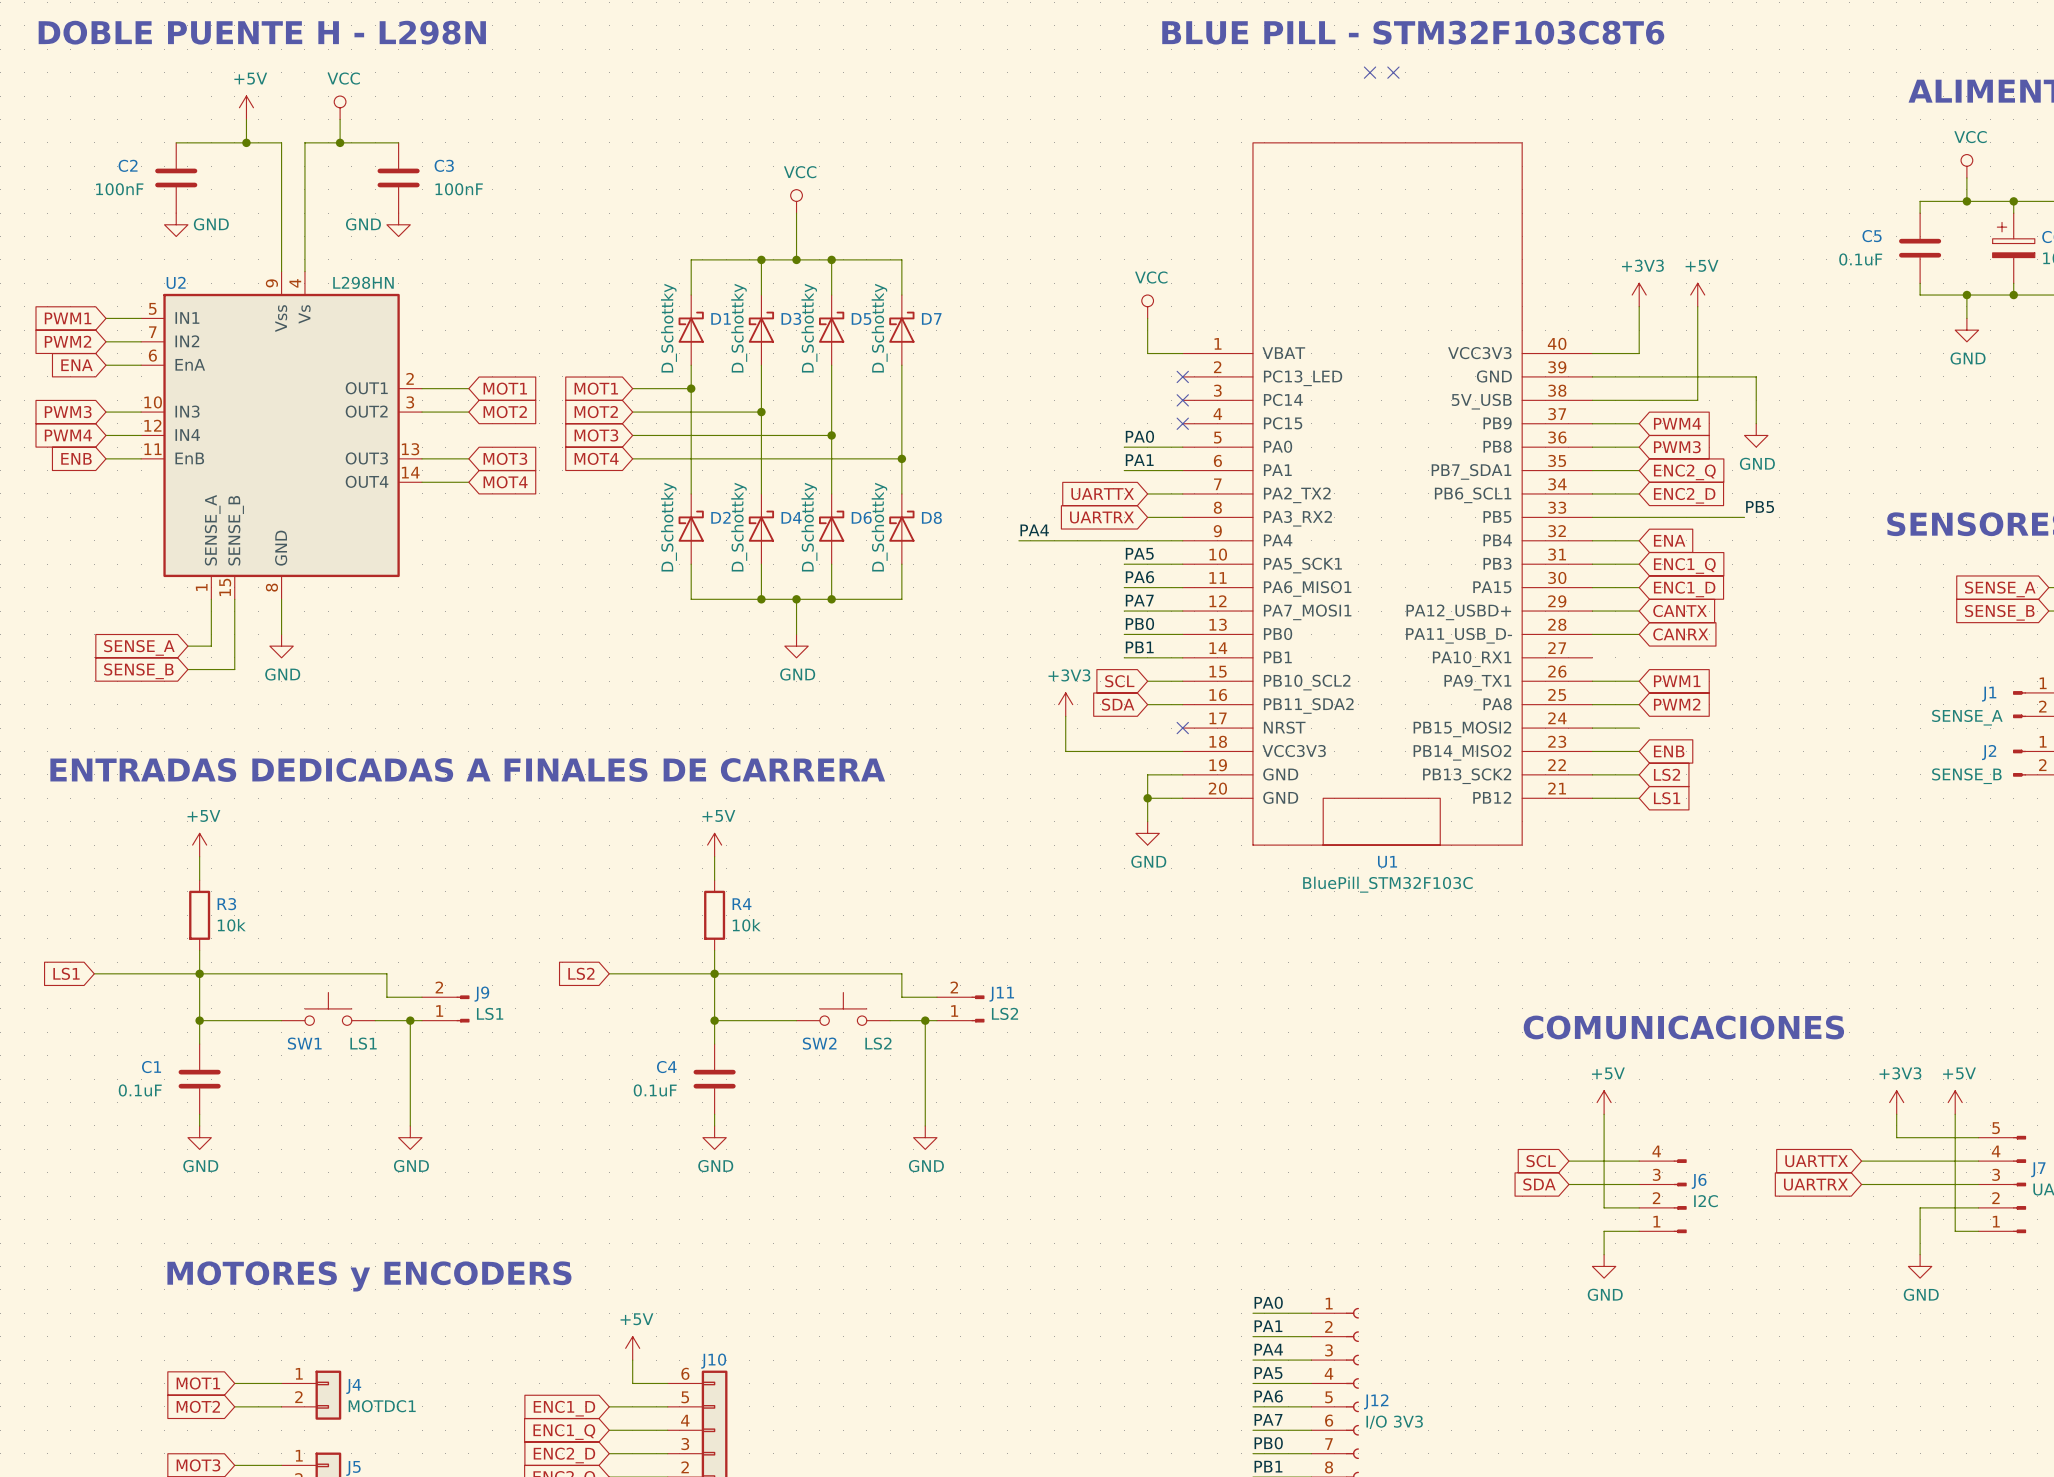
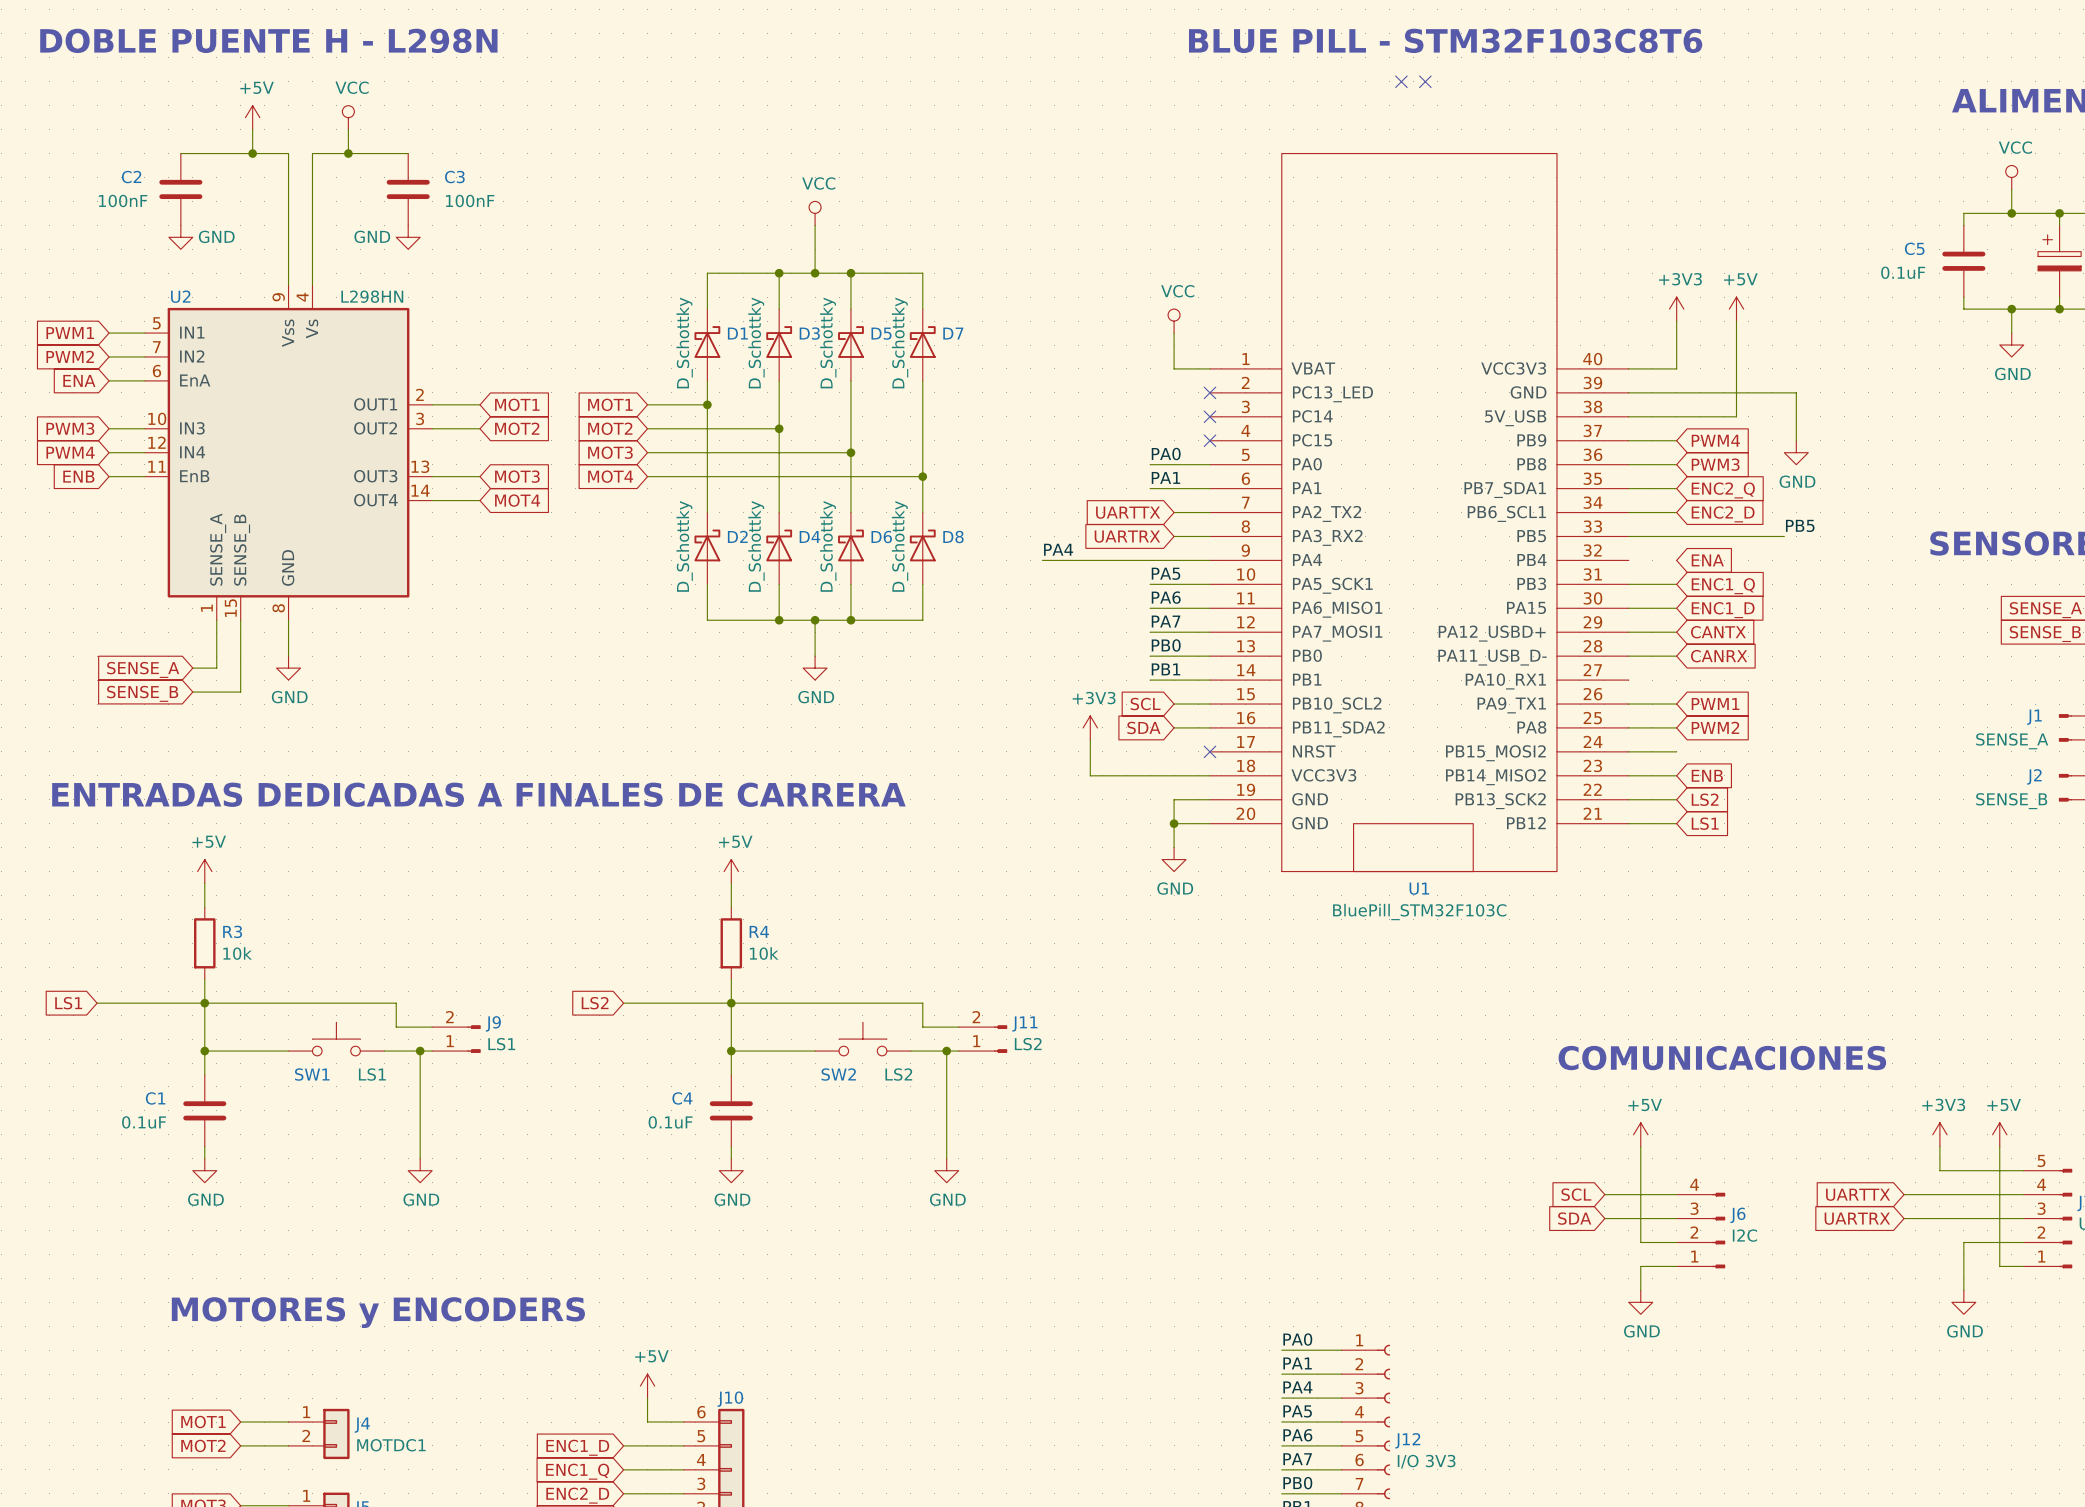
wire: (1592, 540) (1639, 540) -> none

